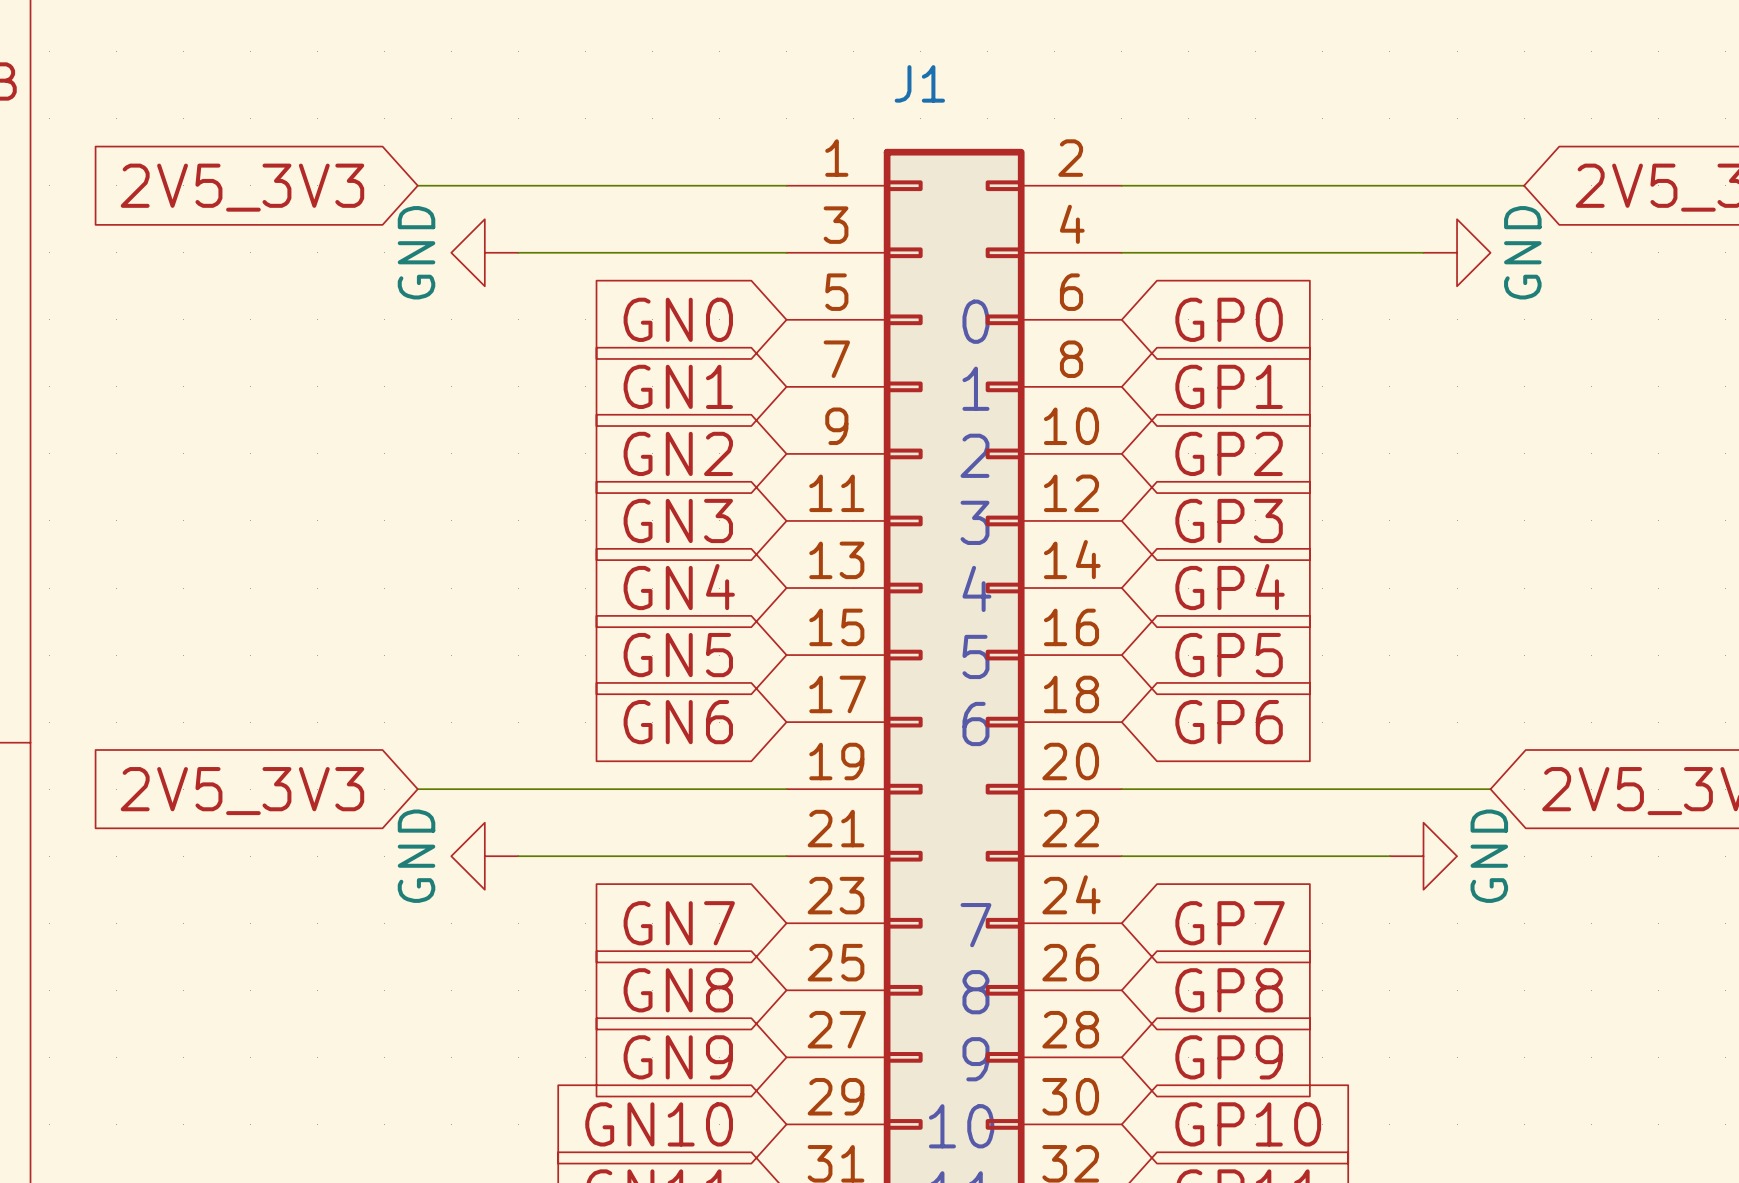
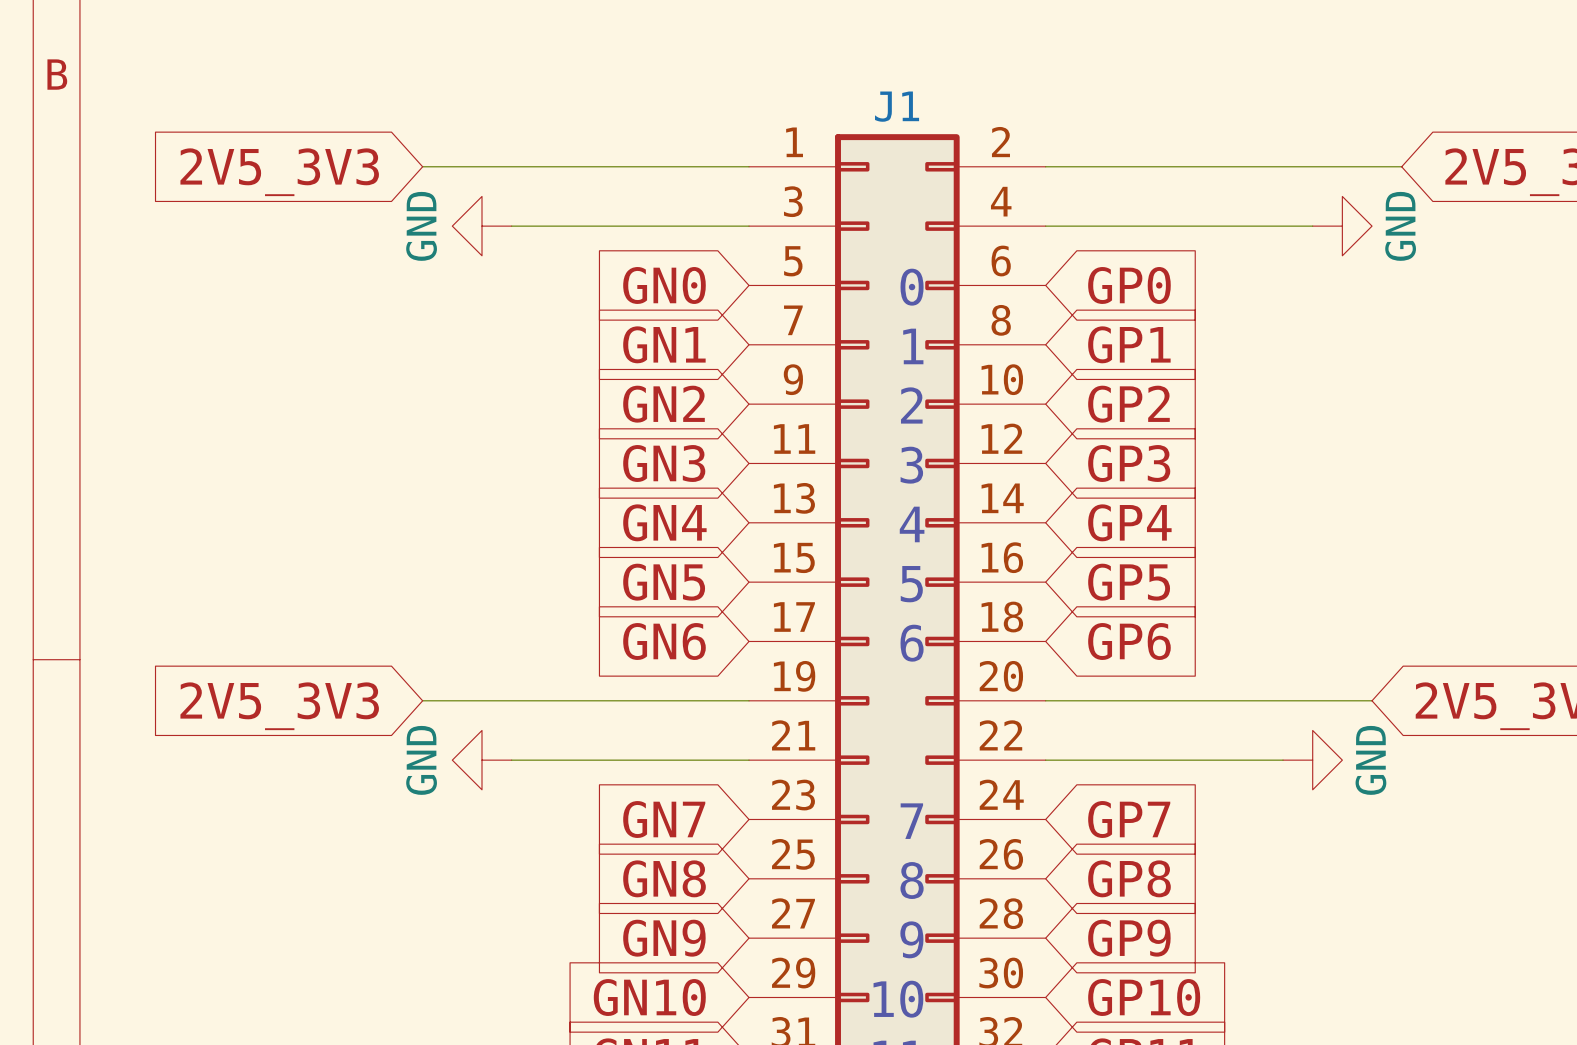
J1 name position: J1 (919, 83) -> J1 (897, 106)

